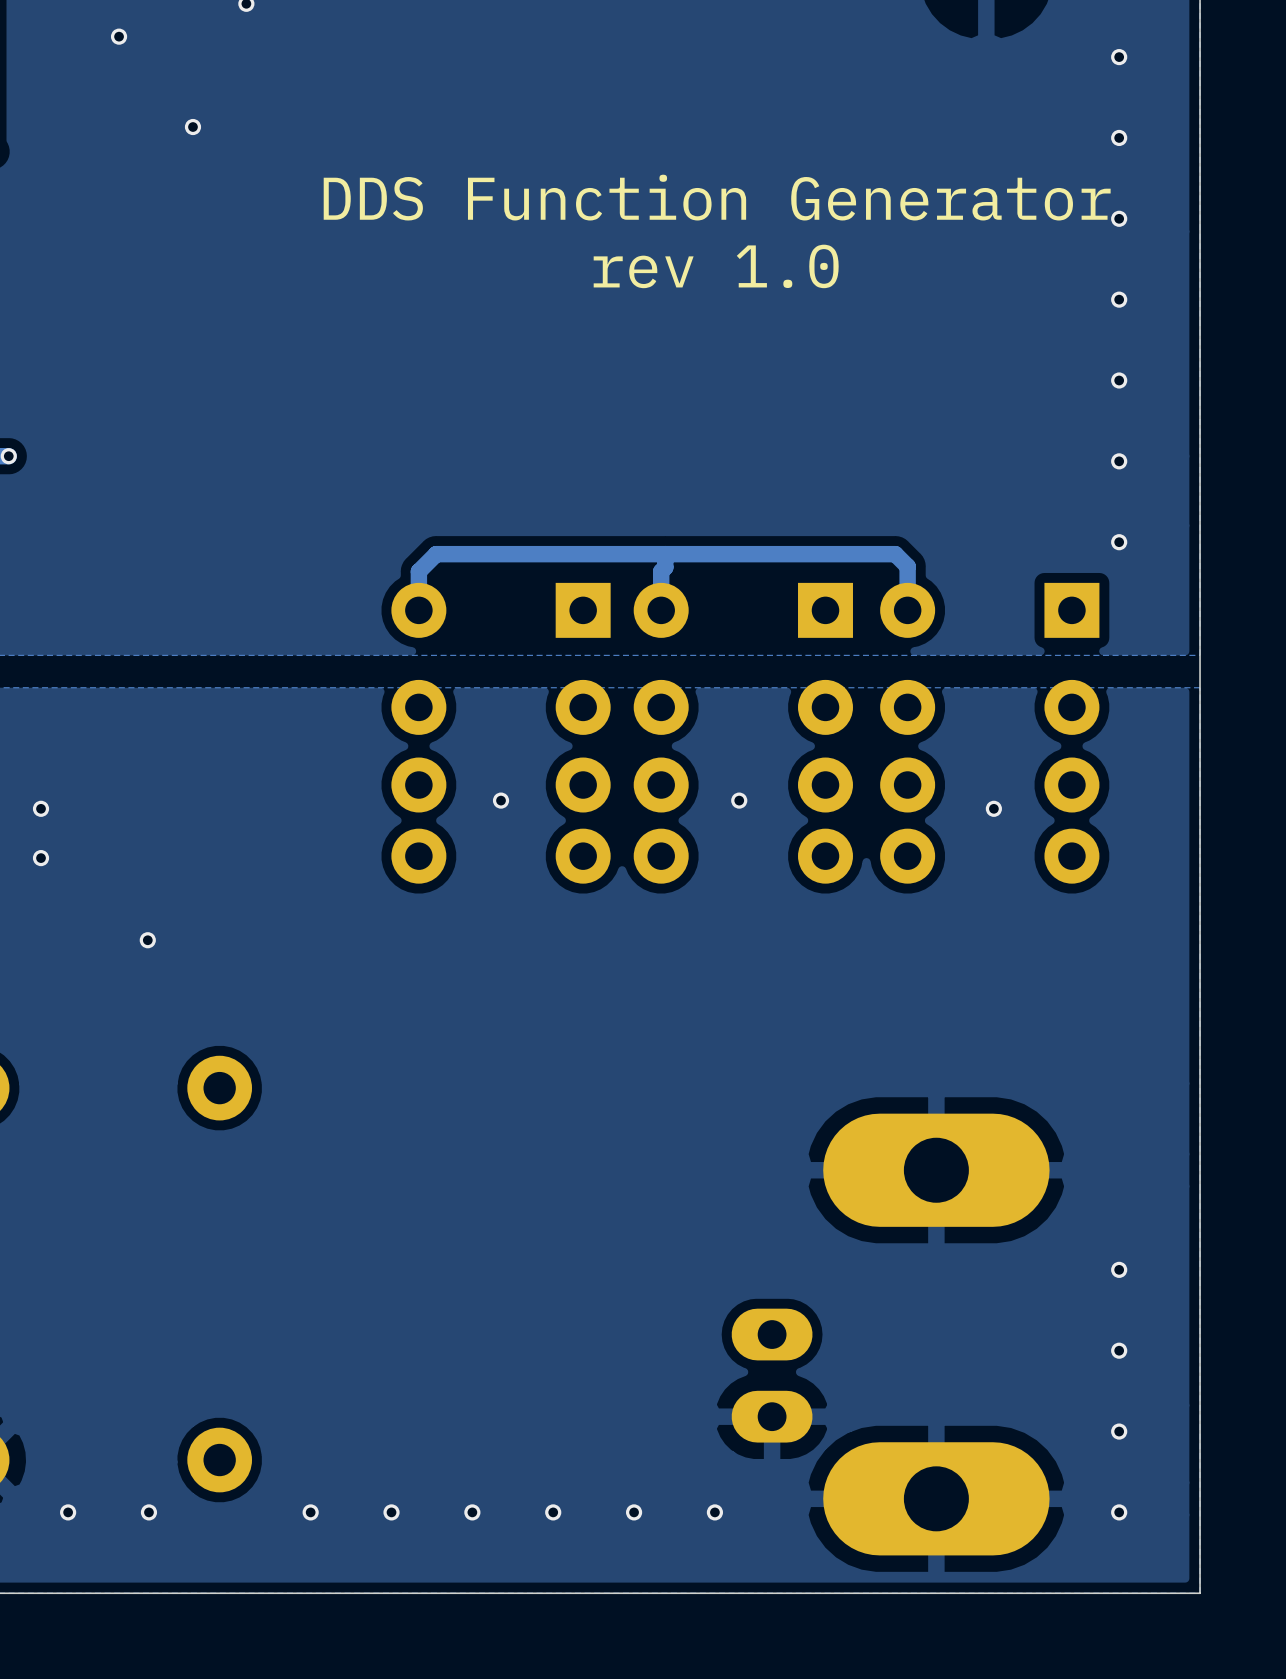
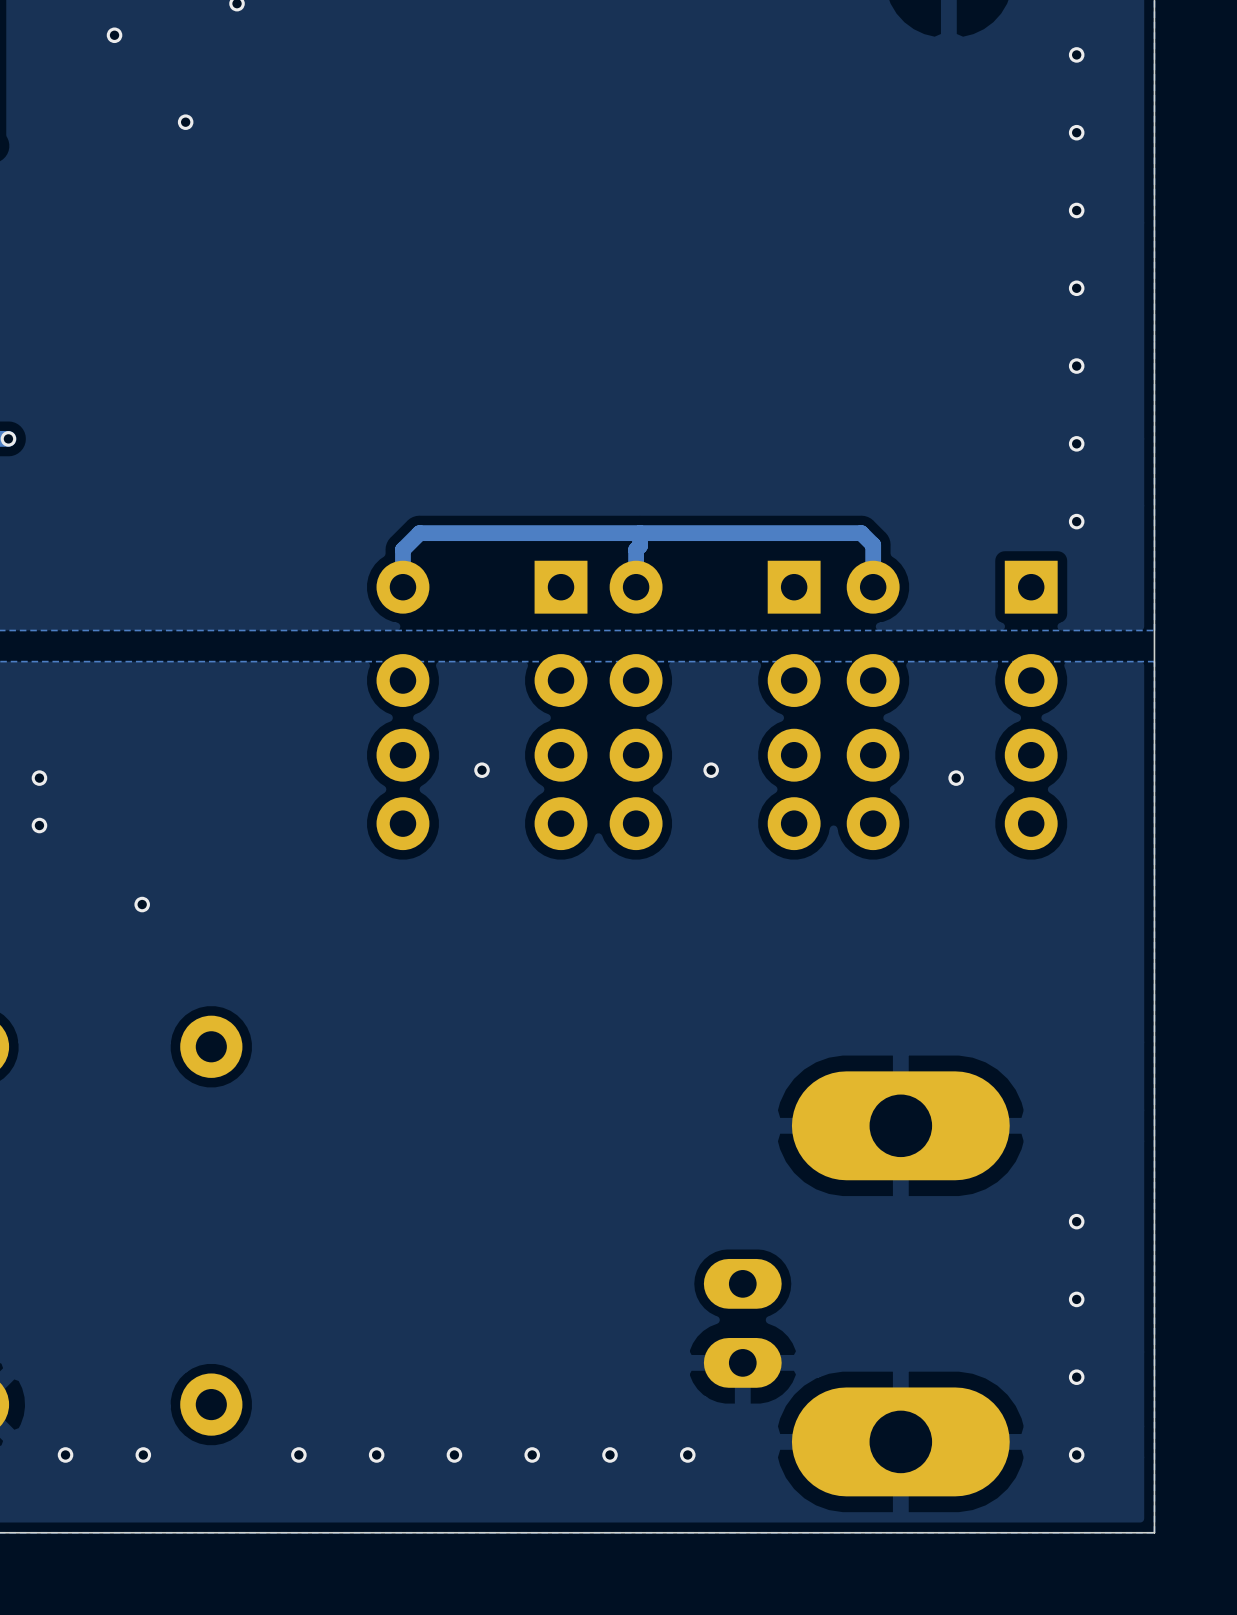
text: DDS Function Generator (717, 197) -> none
text: rev 1.0 (716, 266) -> none

